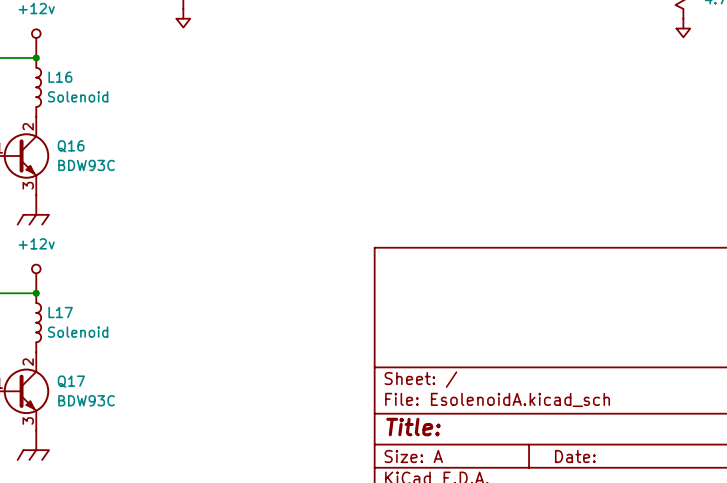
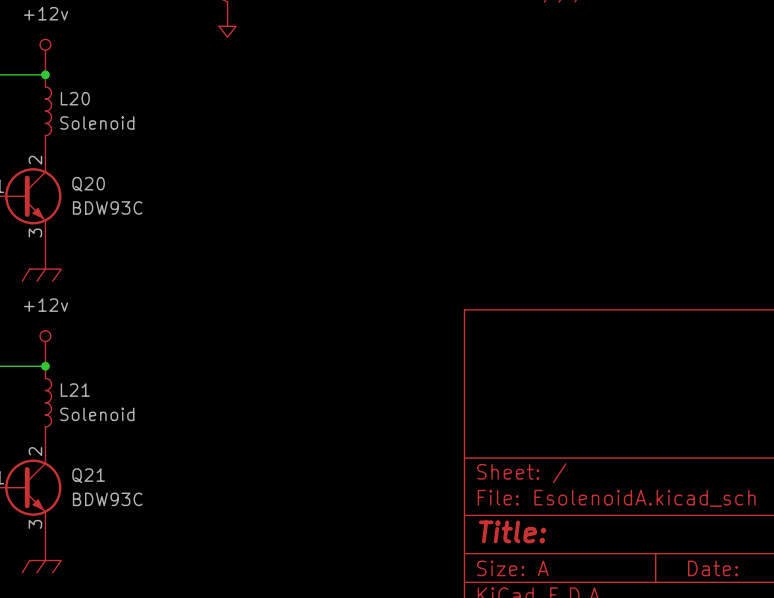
L16 name: L16 (60, 77) -> L20 (75, 98)
Q16 name: Q16 (71, 146) -> Q20 (88, 184)
L17 name: L17 (60, 312) -> L21 (75, 390)
Q17 name: Q17 (71, 381) -> Q21 (88, 475)

